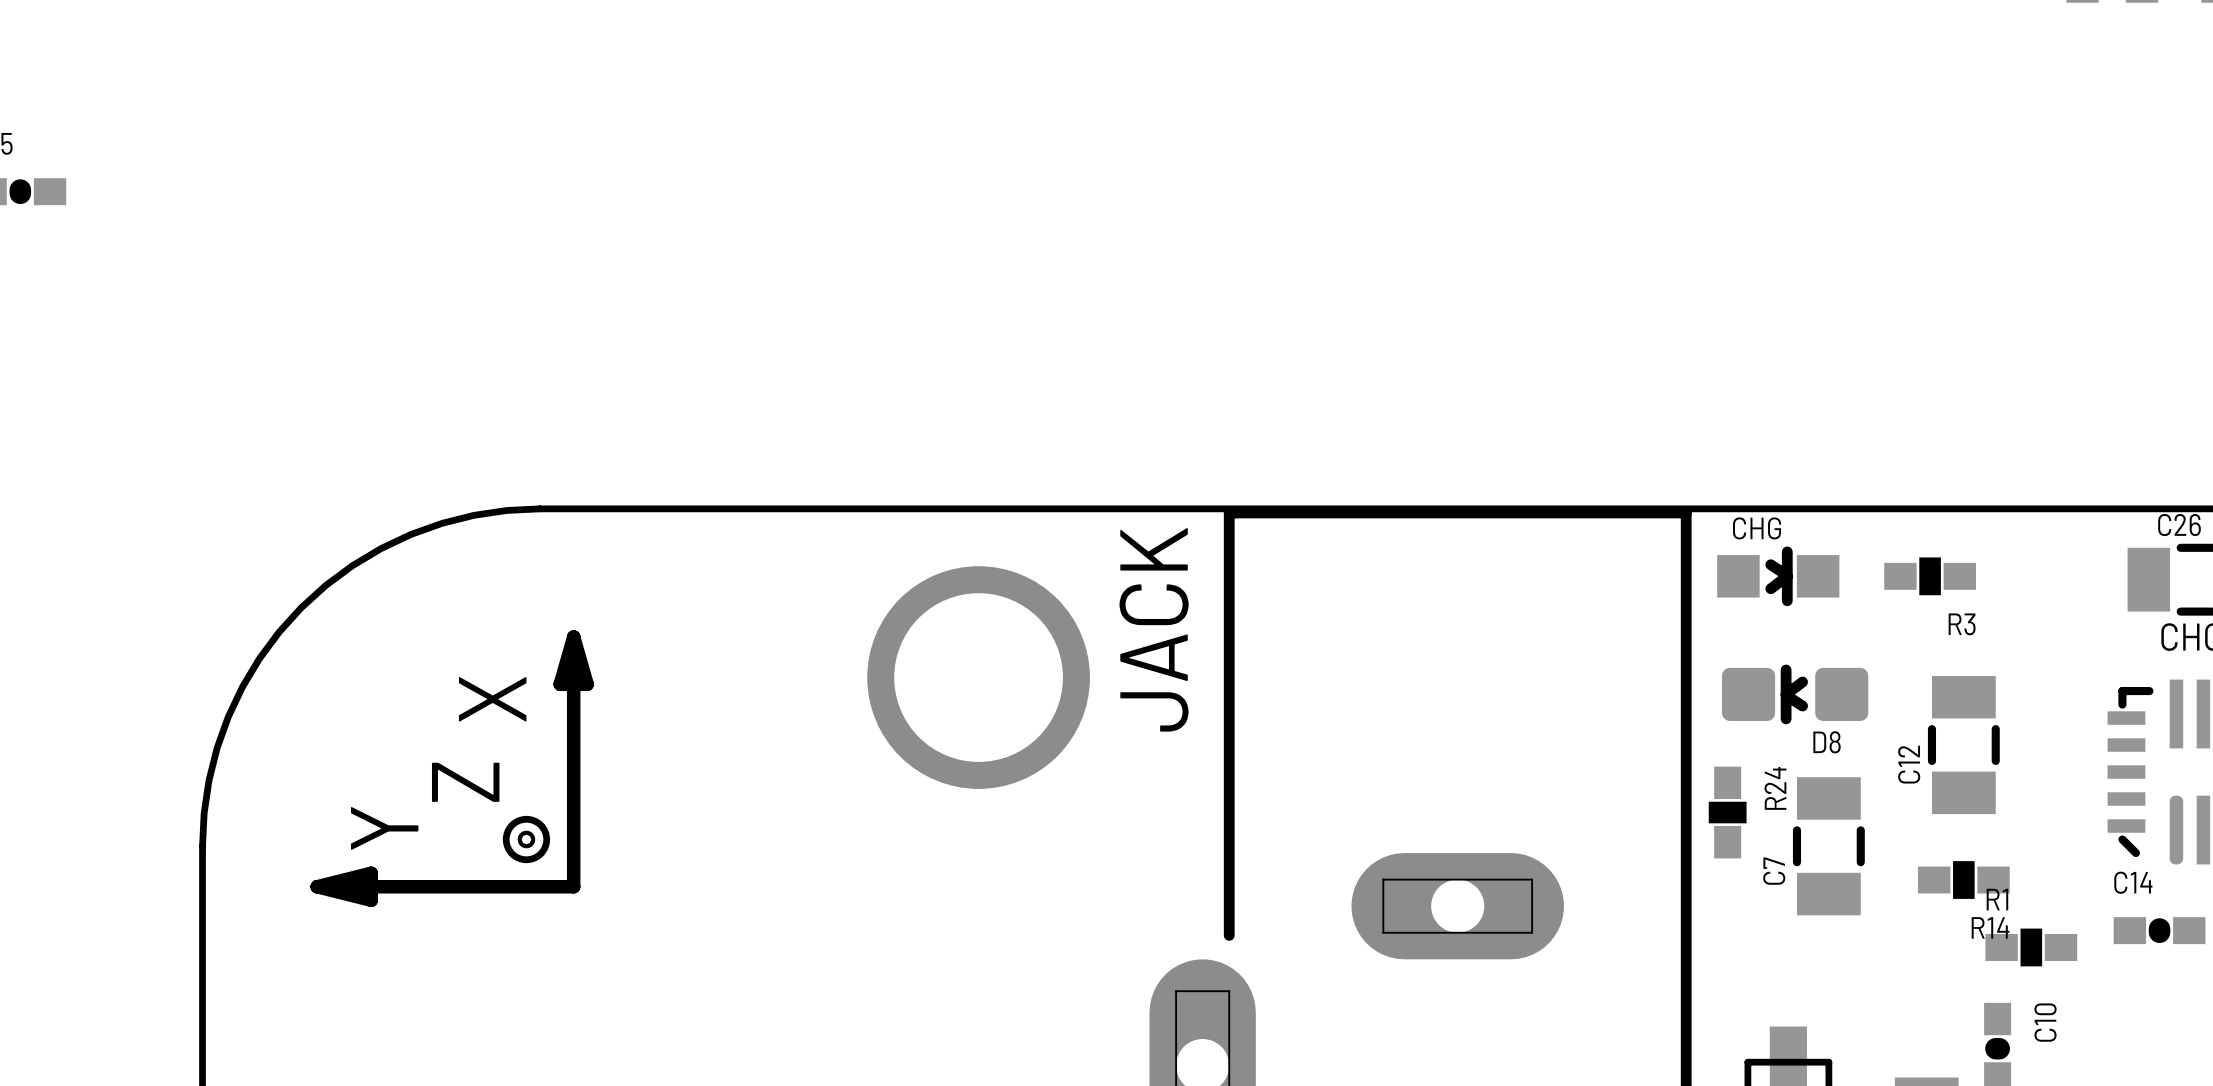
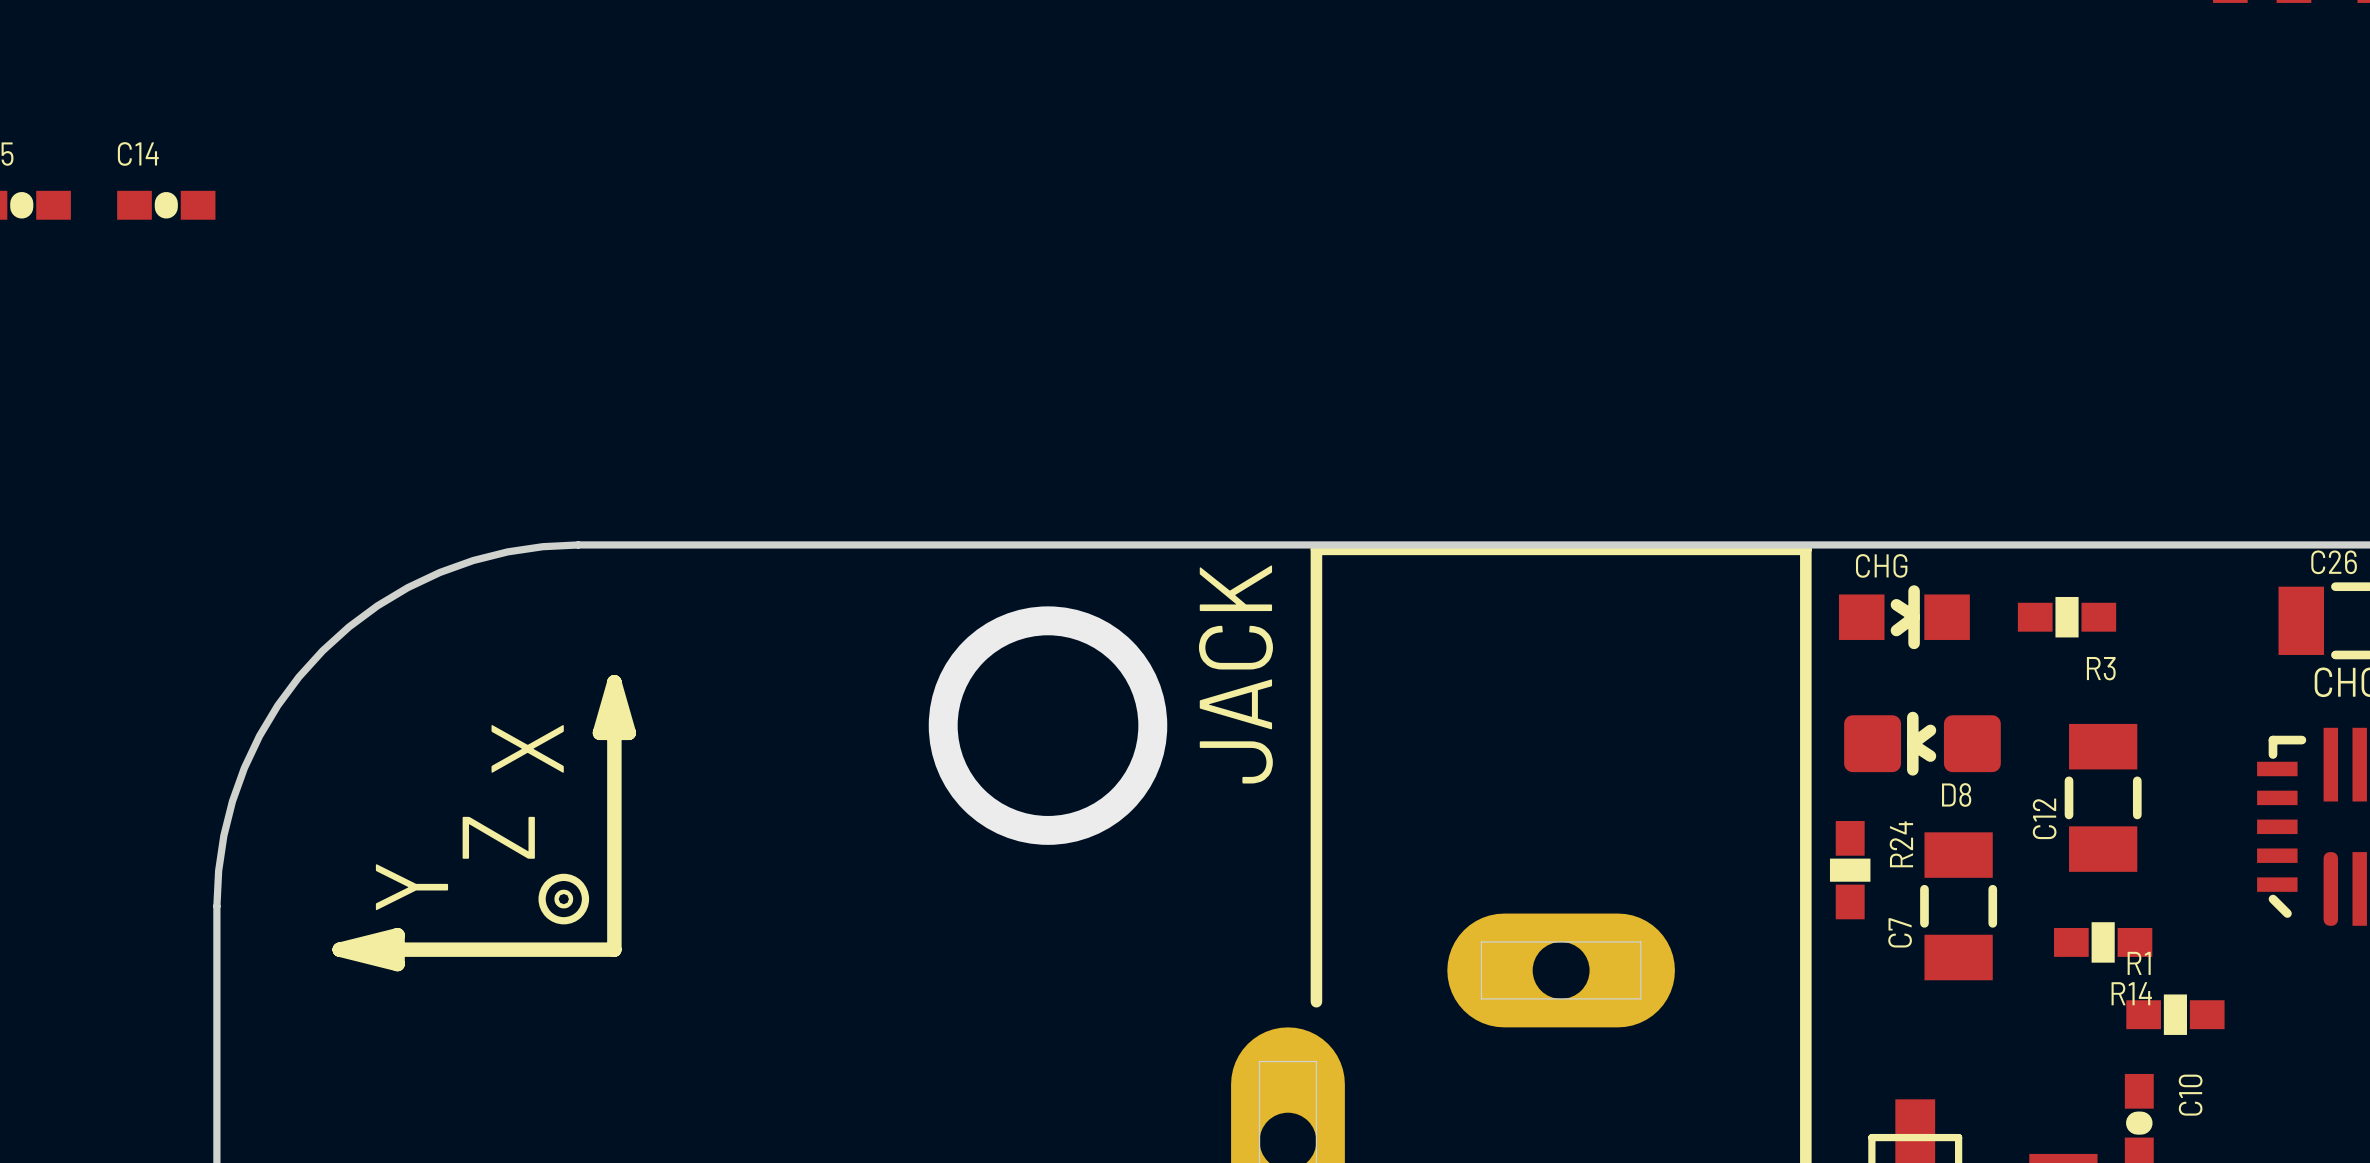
C14 position: (2159, 930) -> (166, 205)

